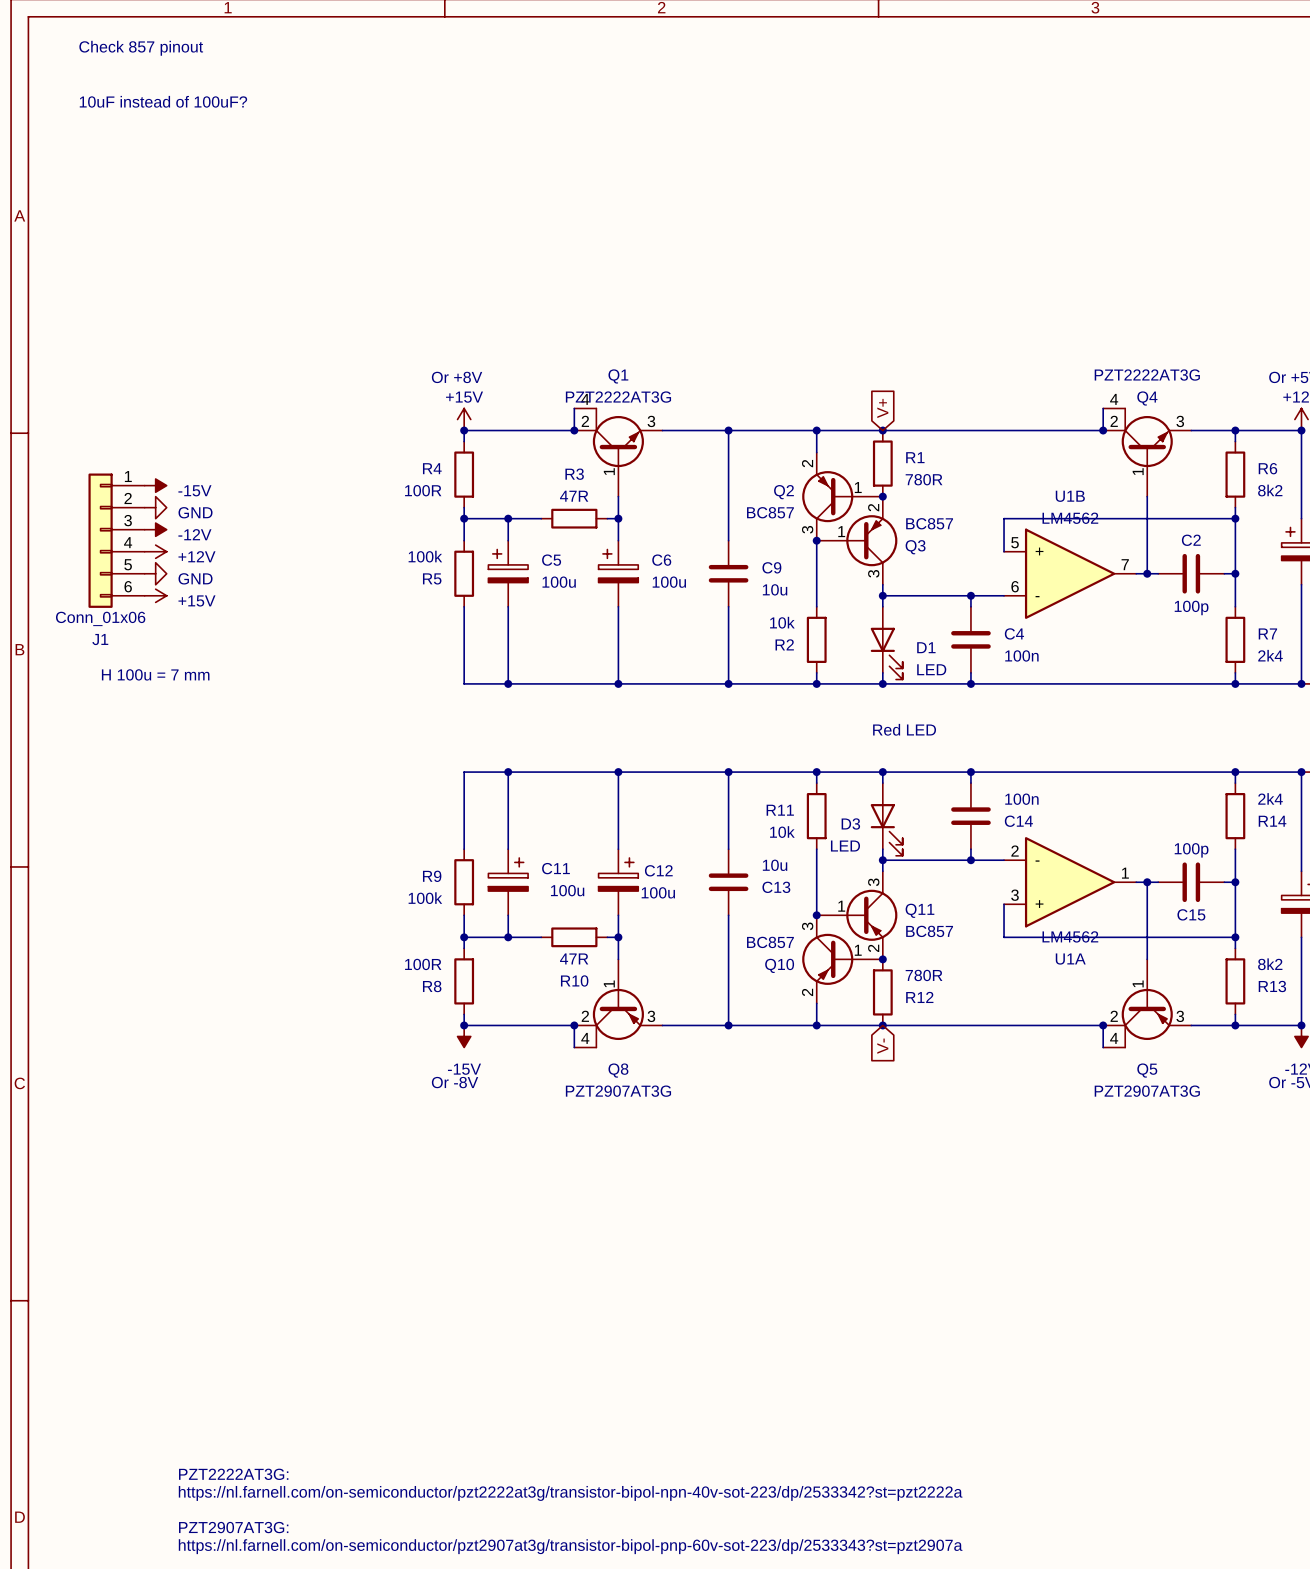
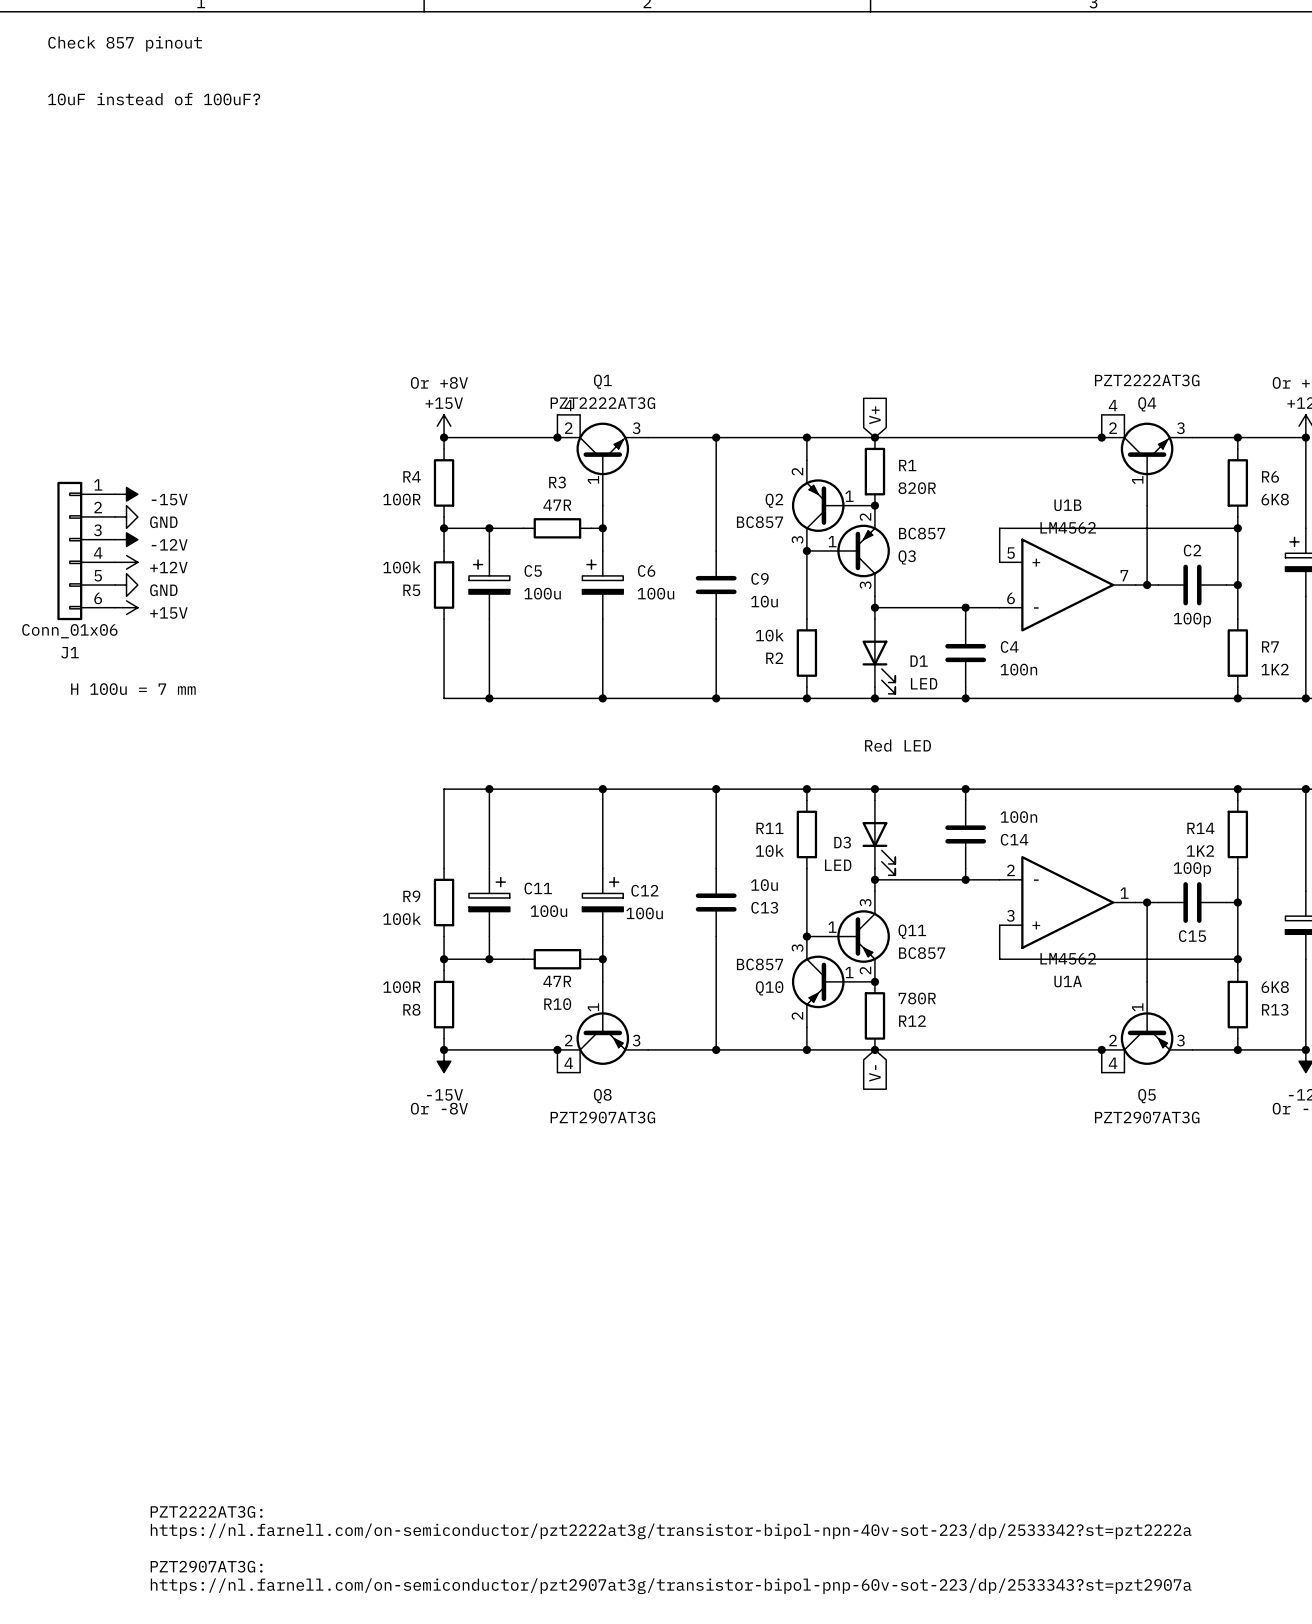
R1 value: 780R (924, 479) -> 820R (917, 488)
R6 value: 8k2 (1270, 490) -> 6K8 (1275, 499)
R7 value: 2k4 (1270, 655) -> 1K2 (1275, 669)
R14 value: 2k4 (1270, 798) -> 1K2 (1200, 850)
R14 name position: R14 (1272, 821) -> R14 (1200, 828)
R13 value: 8k2 (1270, 964) -> 6K8 (1275, 987)

